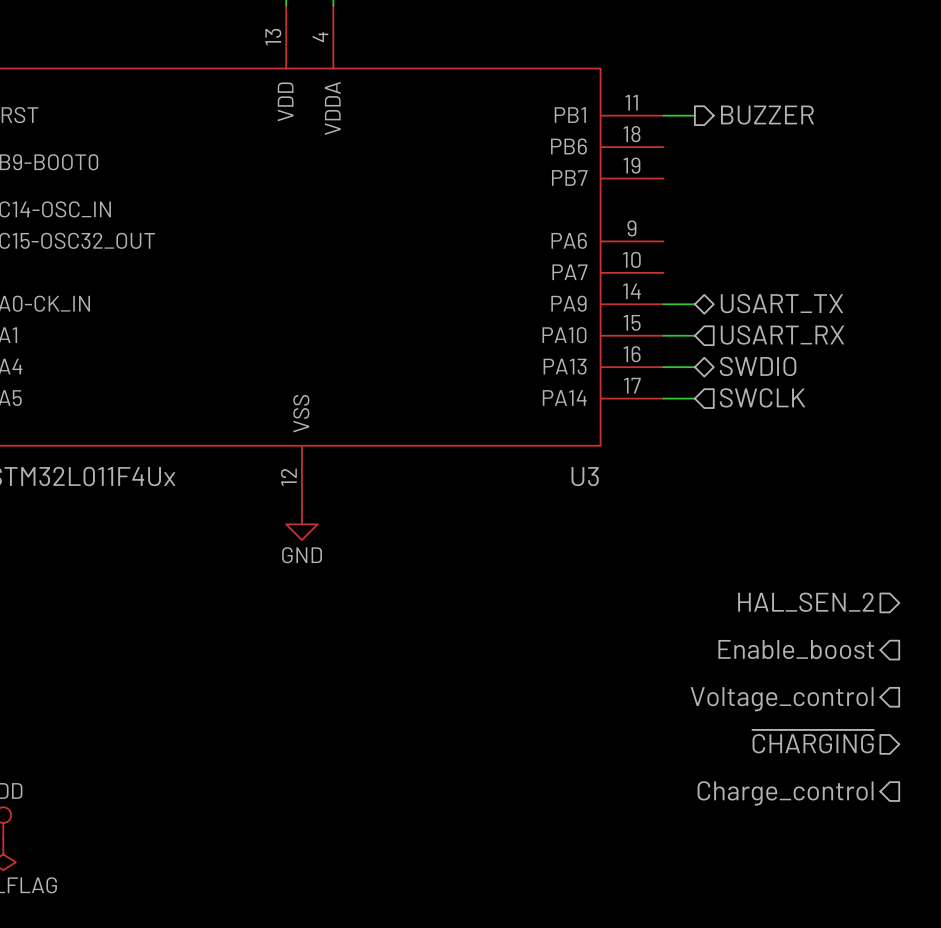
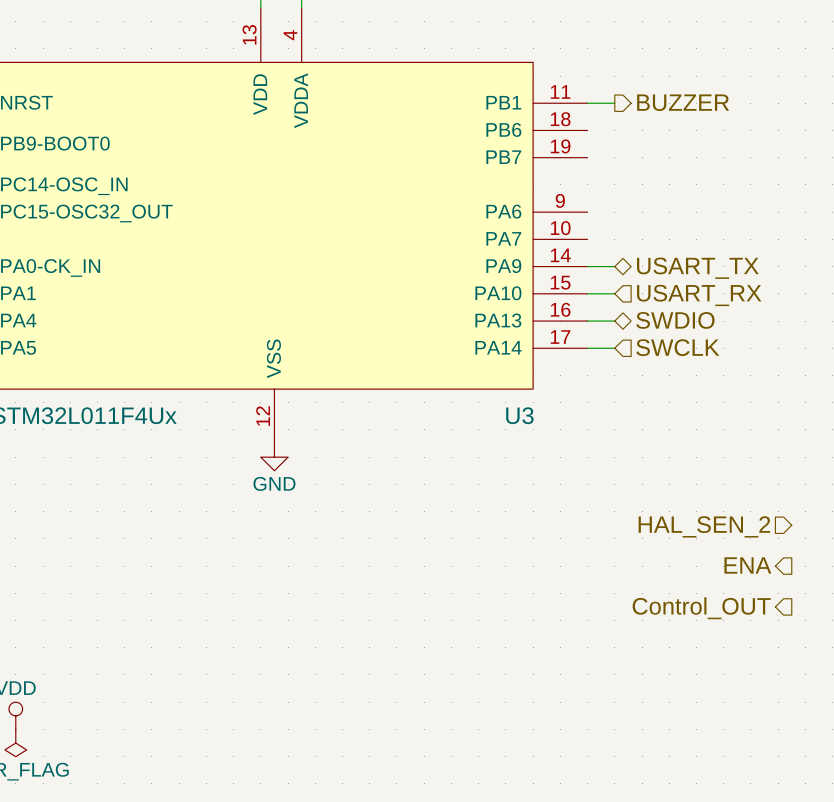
hierarchical label: Enable_boost (796, 649) -> ENA (747, 565)
hierarchical label: Voltage_control (782, 699) -> Control_OUT (701, 608)
hierarchical label: ~{CHARGING} (813, 741) -> none
hierarchical label: Charge_control (785, 793) -> none

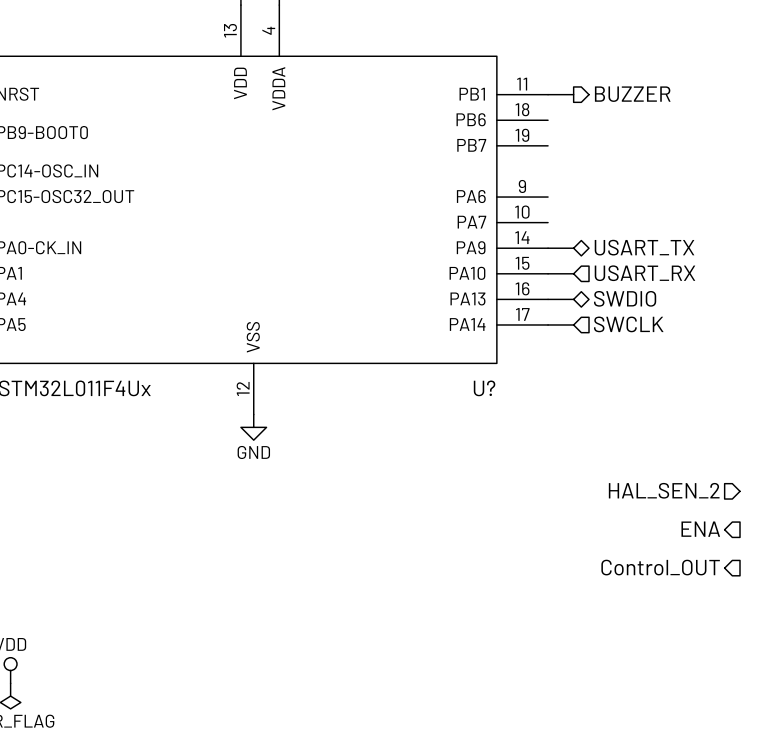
U3 name: U3 (519, 415) -> U? (484, 388)

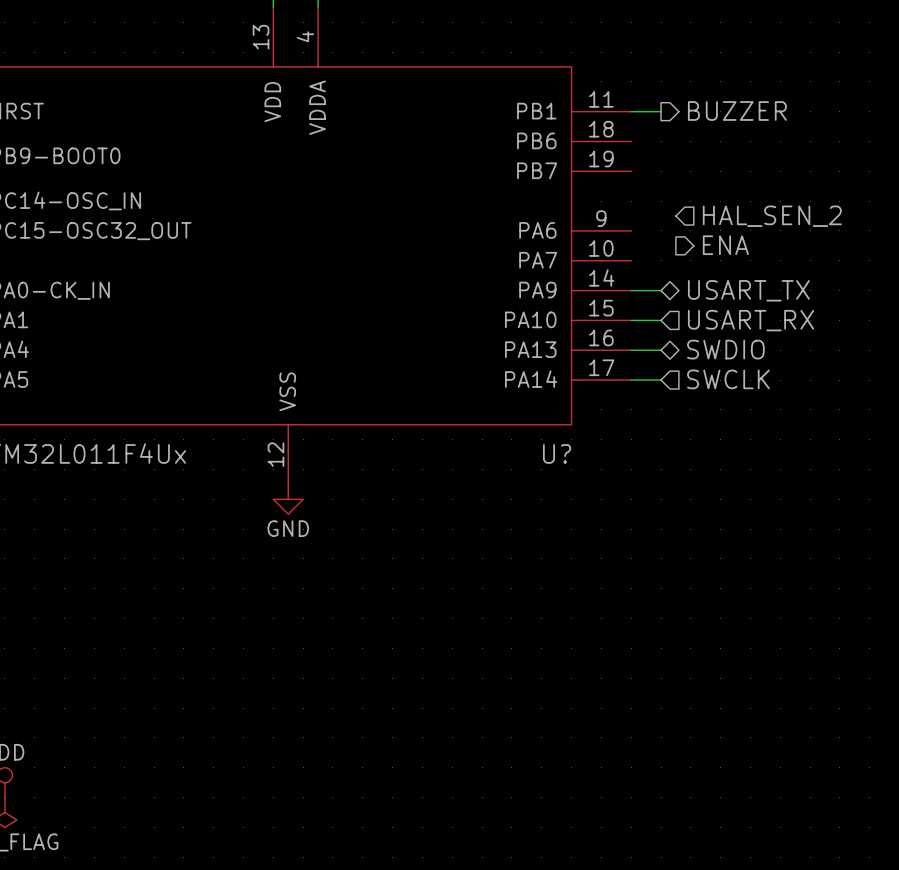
hierarchical label: none -> HAL_SEN_2 (772, 216)
hierarchical label: none -> ENA (725, 245)
hierarchical label: HAL_SEN_2 (664, 490) -> none
hierarchical label: ENA (700, 529) -> none
hierarchical label: Control_OUT (660, 567) -> none

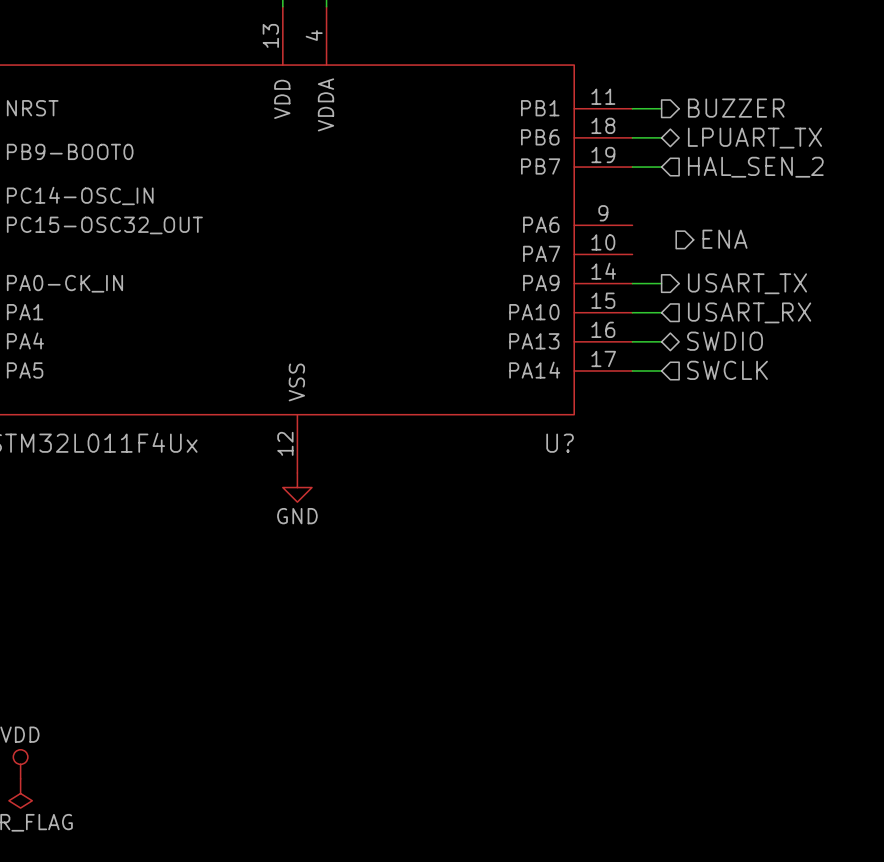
wire: none -> (632, 137) (661, 137)
hierarchical label: none -> LPUART_TX (754, 138)
wire: none -> (632, 167) (661, 167)
hierarchical label position: HAL_SEN_2 (772, 216) -> HAL_SEN_2 (755, 167)
hierarchical label shape: bidirectional (748, 290) -> output (747, 283)

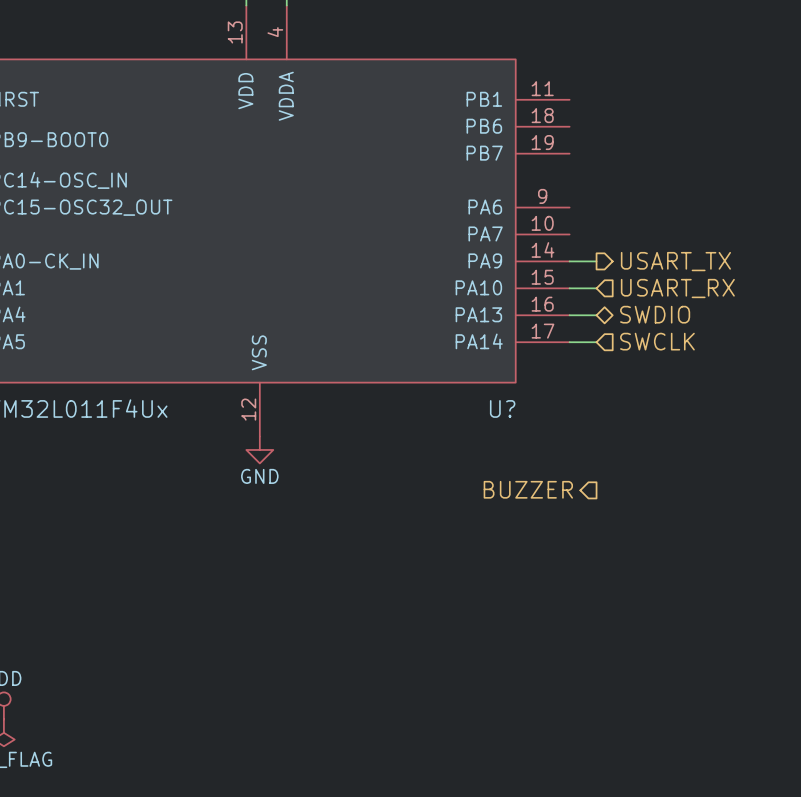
wire: (632, 108) (661, 108) -> none
hierarchical label: BUZZER (736, 108) -> none
wire: (632, 137) (661, 137) -> none
hierarchical label: LPUART_TX (754, 138) -> none
wire: (632, 167) (661, 167) -> none
hierarchical label: HAL_SEN_2 (755, 167) -> none
hierarchical label: ENA (725, 239) -> none
hierarchical label: none -> BUZZER (528, 489)

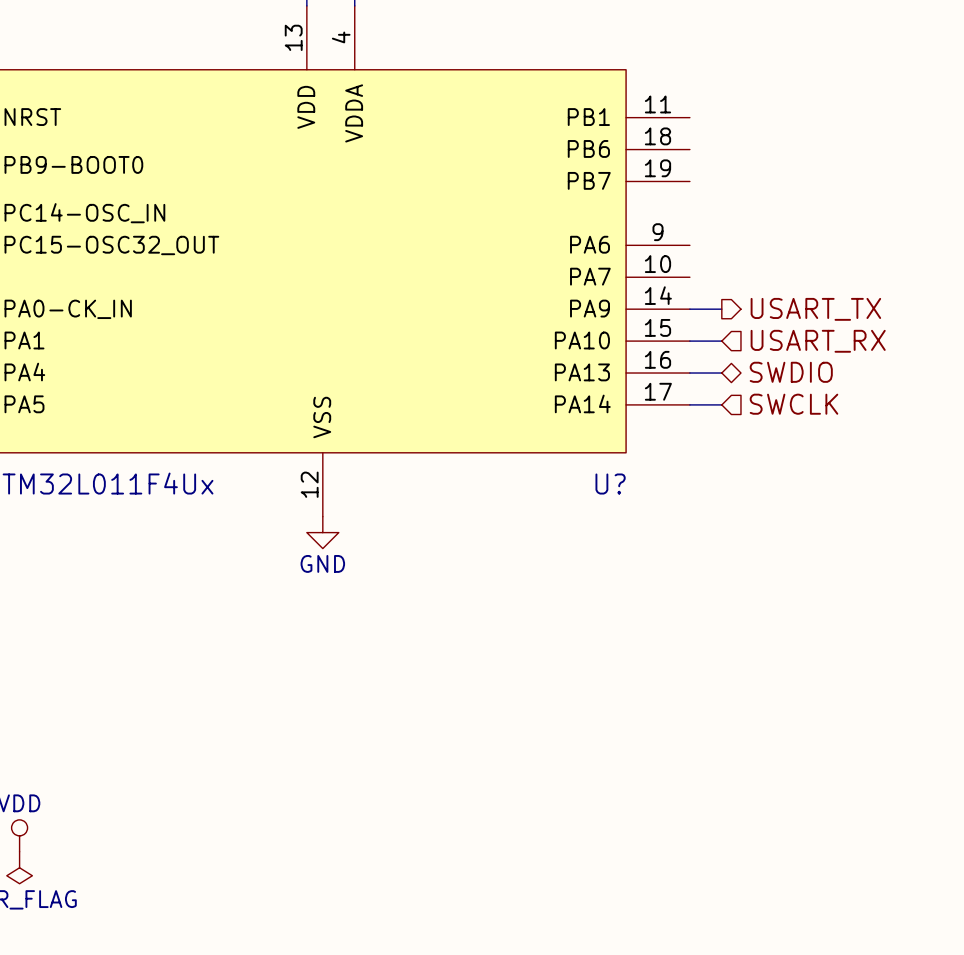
hierarchical label: BUZZER (528, 489) -> none

